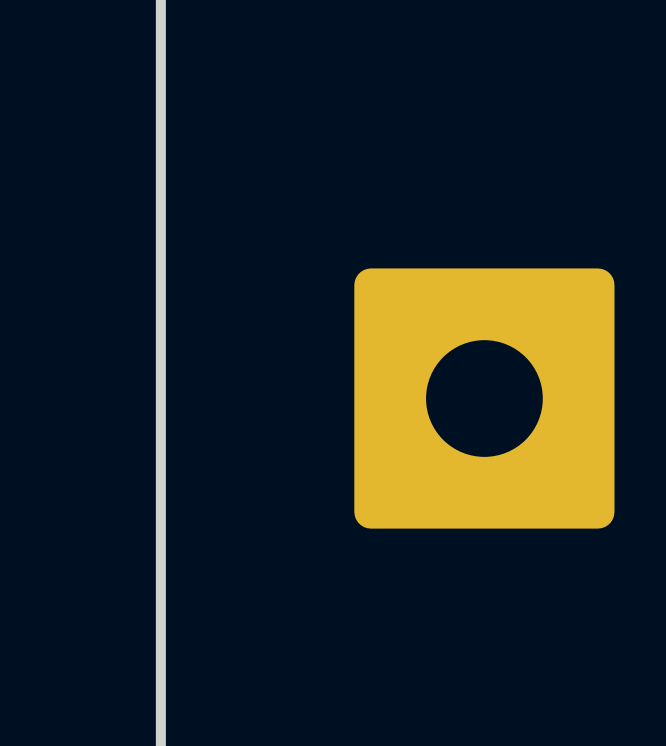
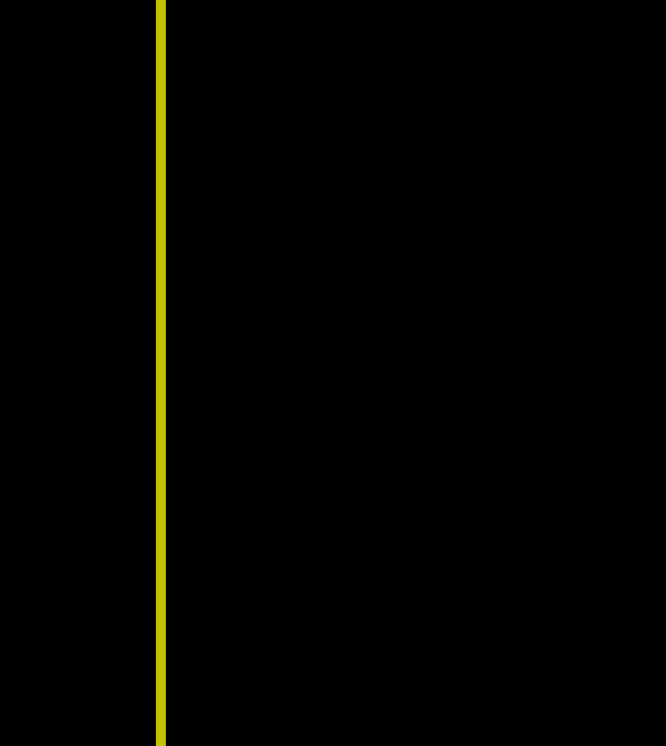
part: (484, 398) -> none

